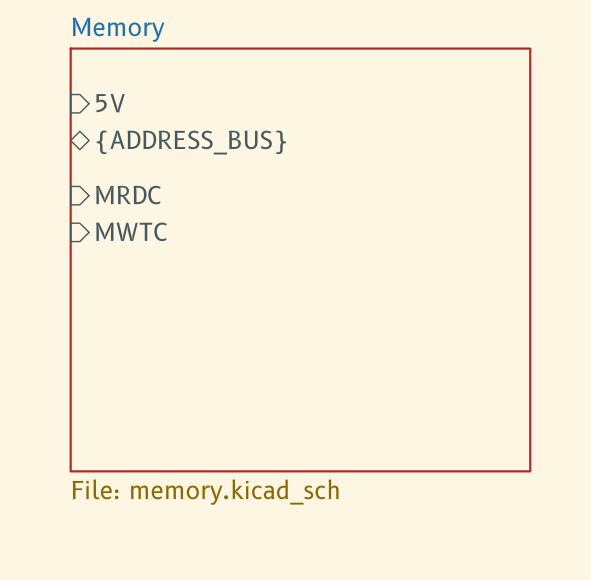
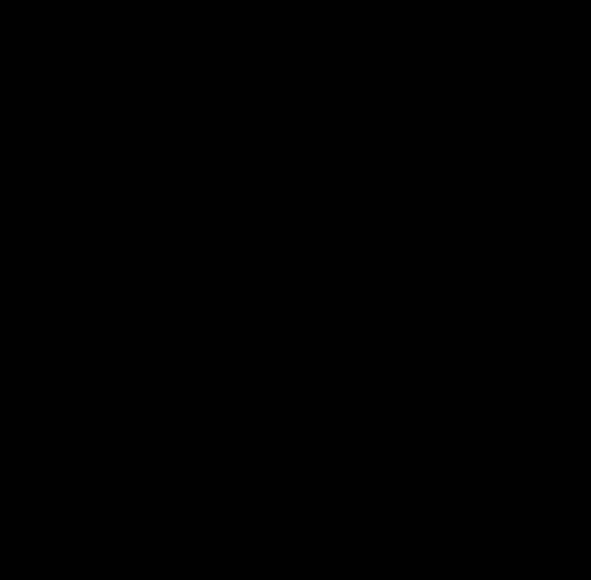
sheet pin: 5V (110, 103) -> none
sheet pin: {ADDRESS_BUS} (191, 142) -> none
sheet pin: MRDC (128, 195) -> none
sheet pin: MWTC (131, 231) -> none
sheet Memory: File: memory.kicad_sch (300, 259) -> none

